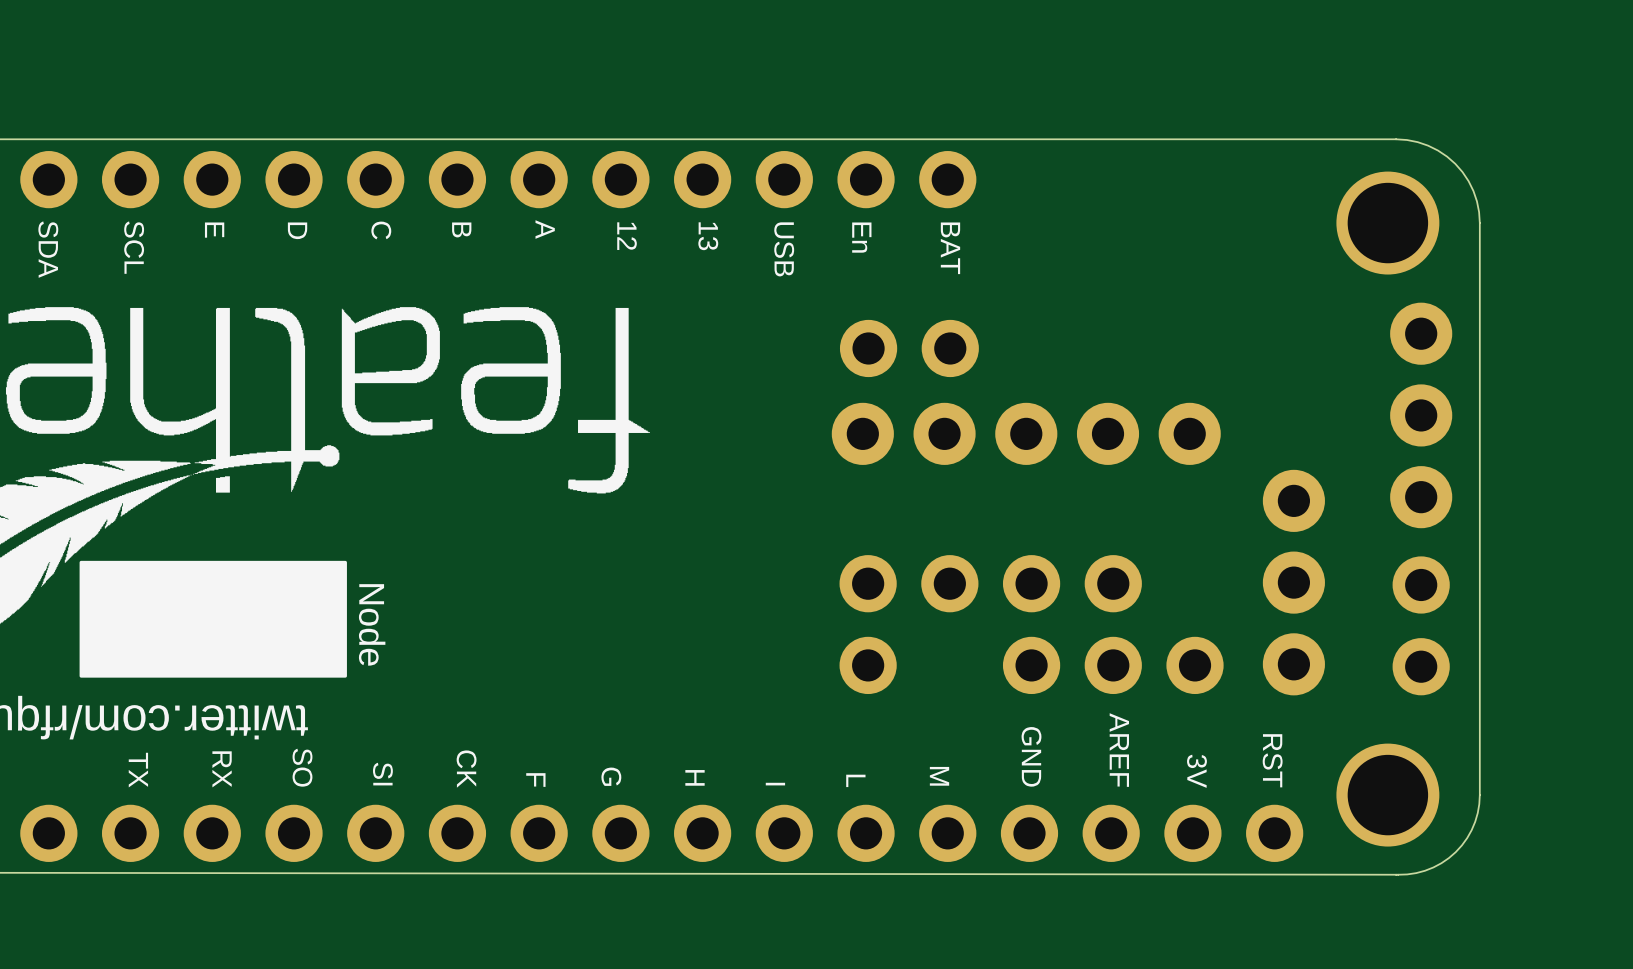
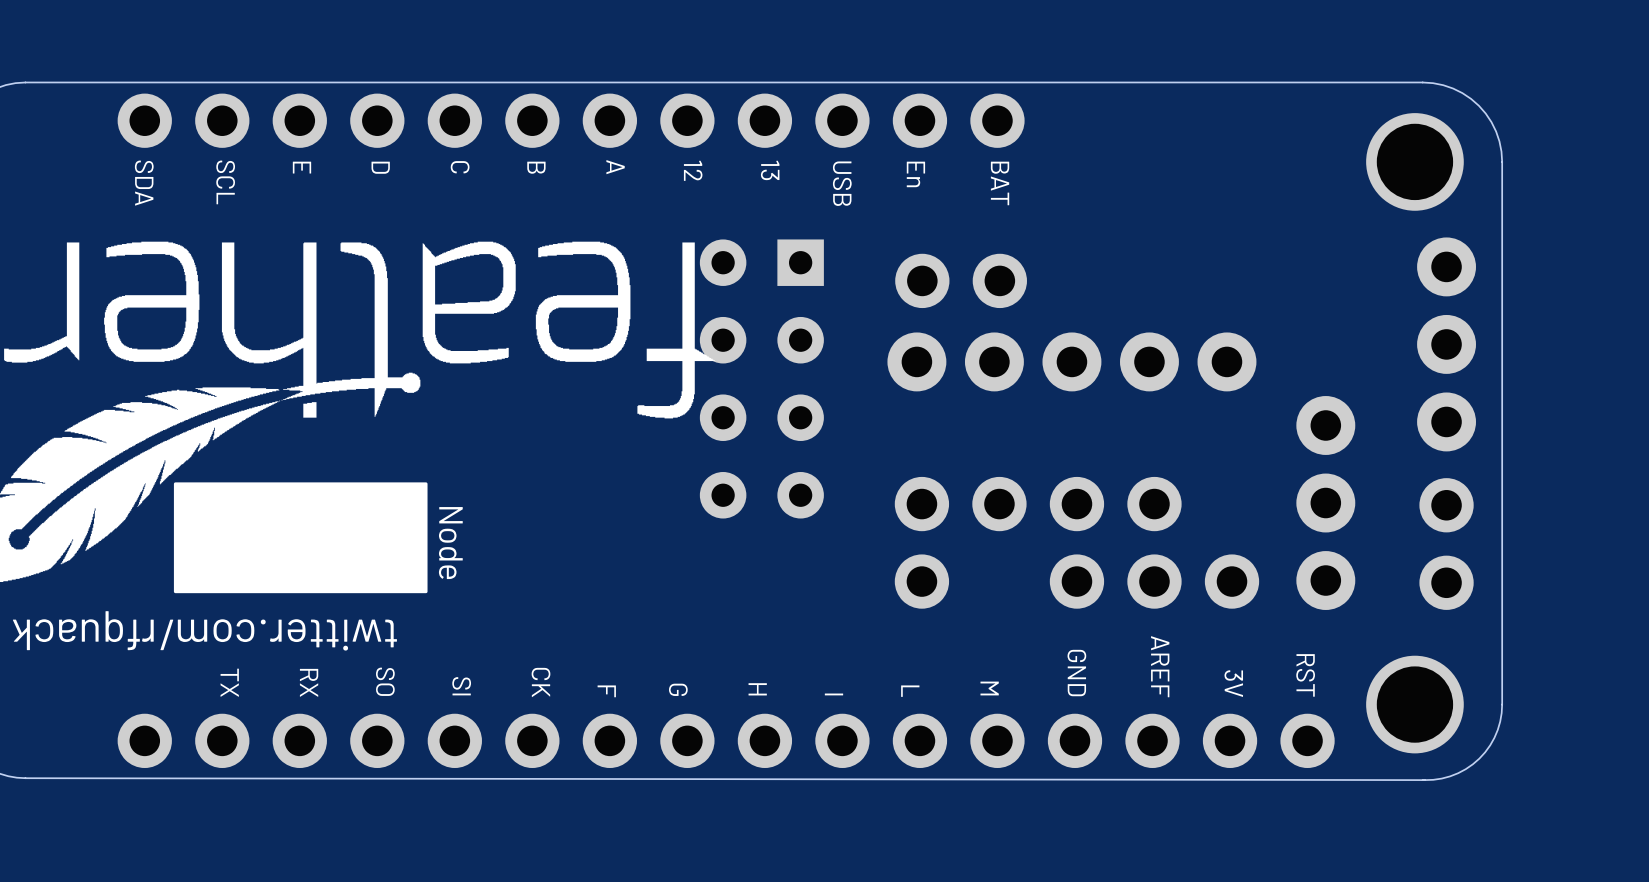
part: none -> (761, 378)

